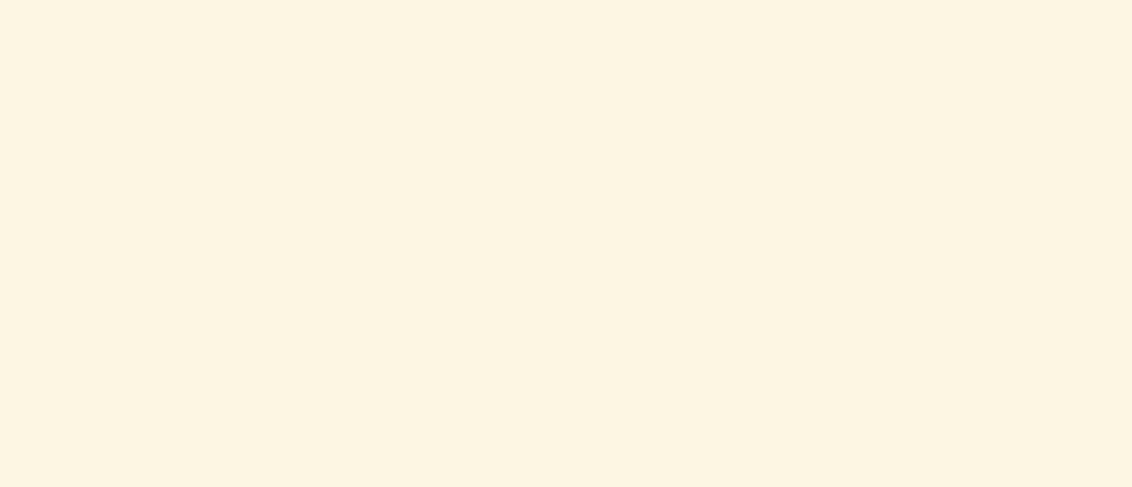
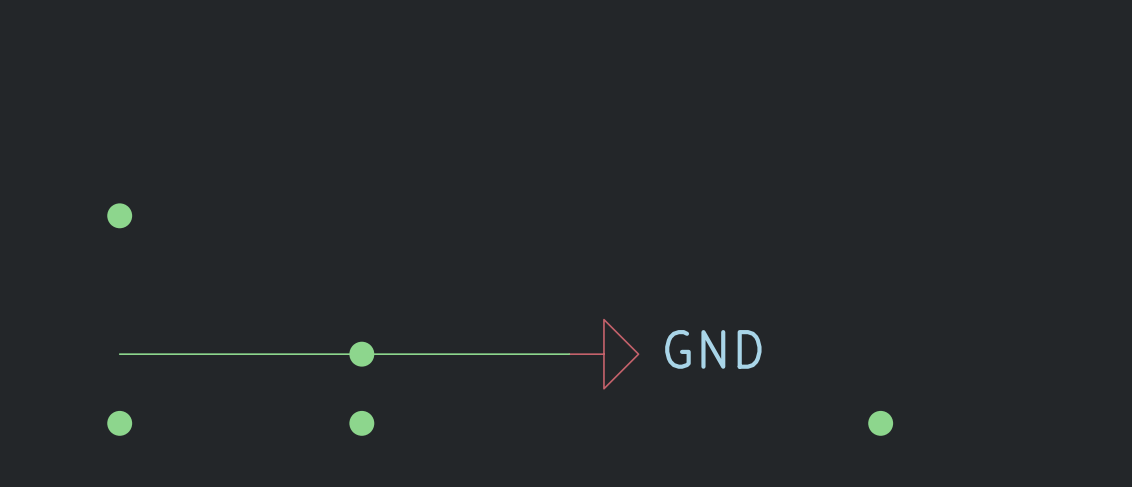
junction: none -> (119, 215)
wire: none -> (119, 354) (569, 354)
junction: none -> (361, 354)
power symbol: none -> GND (603, 354)
junction: none -> (119, 423)
junction: none -> (361, 423)
junction: none -> (880, 423)

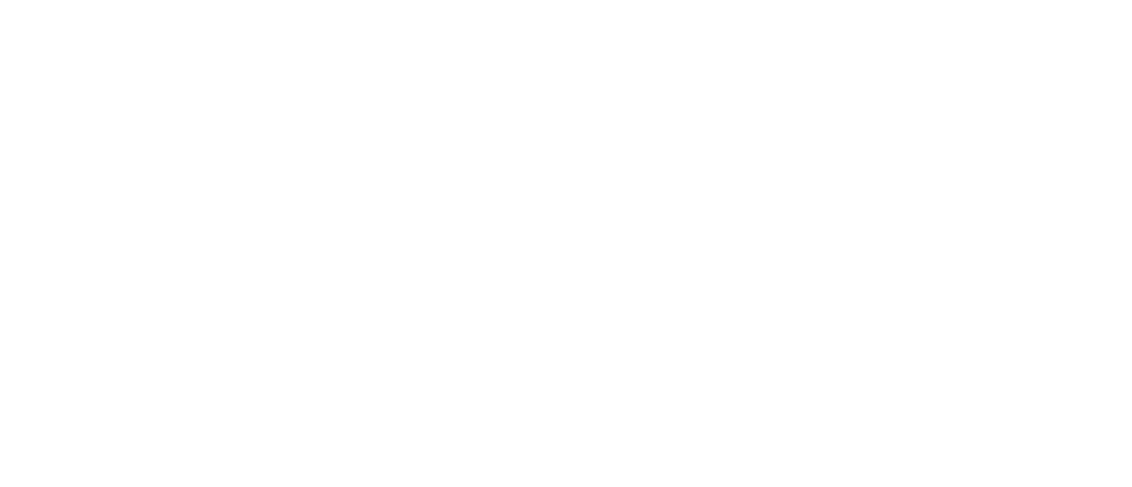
junction: (119, 215) -> none
wire: (119, 354) (569, 354) -> none
junction: (361, 354) -> none
power symbol: GND (603, 354) -> none
junction: (119, 423) -> none
junction: (361, 423) -> none
junction: (880, 423) -> none

